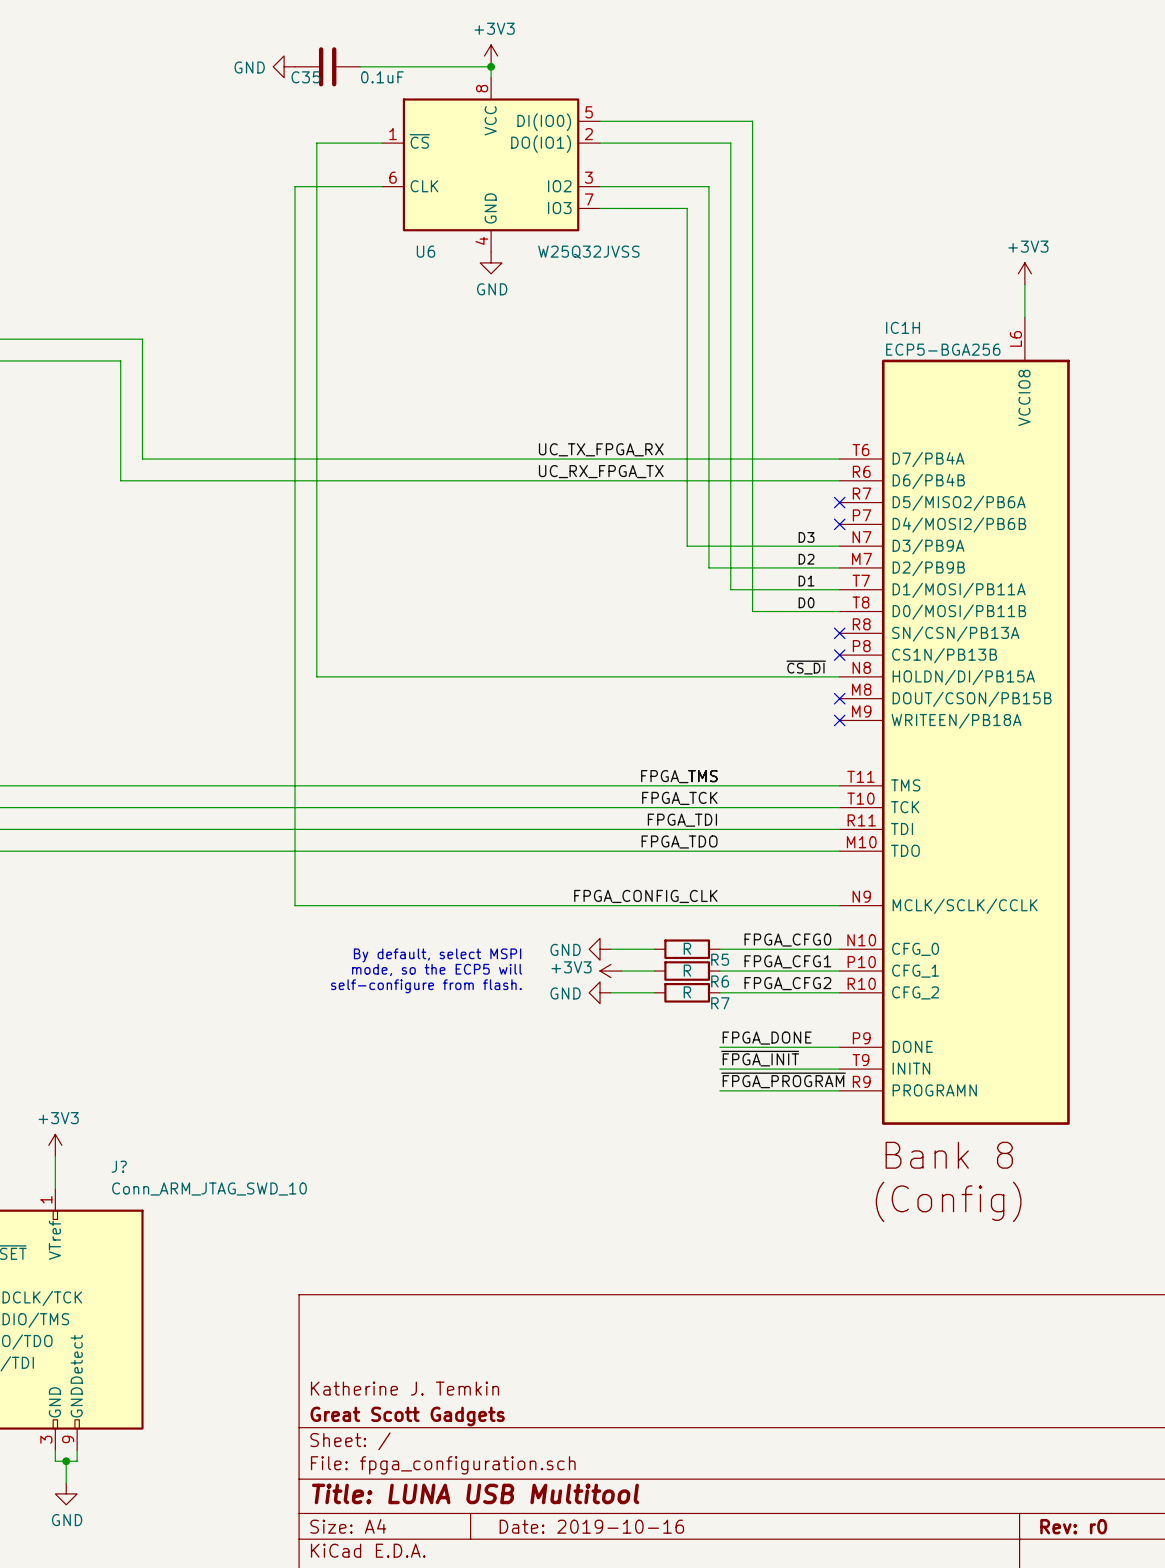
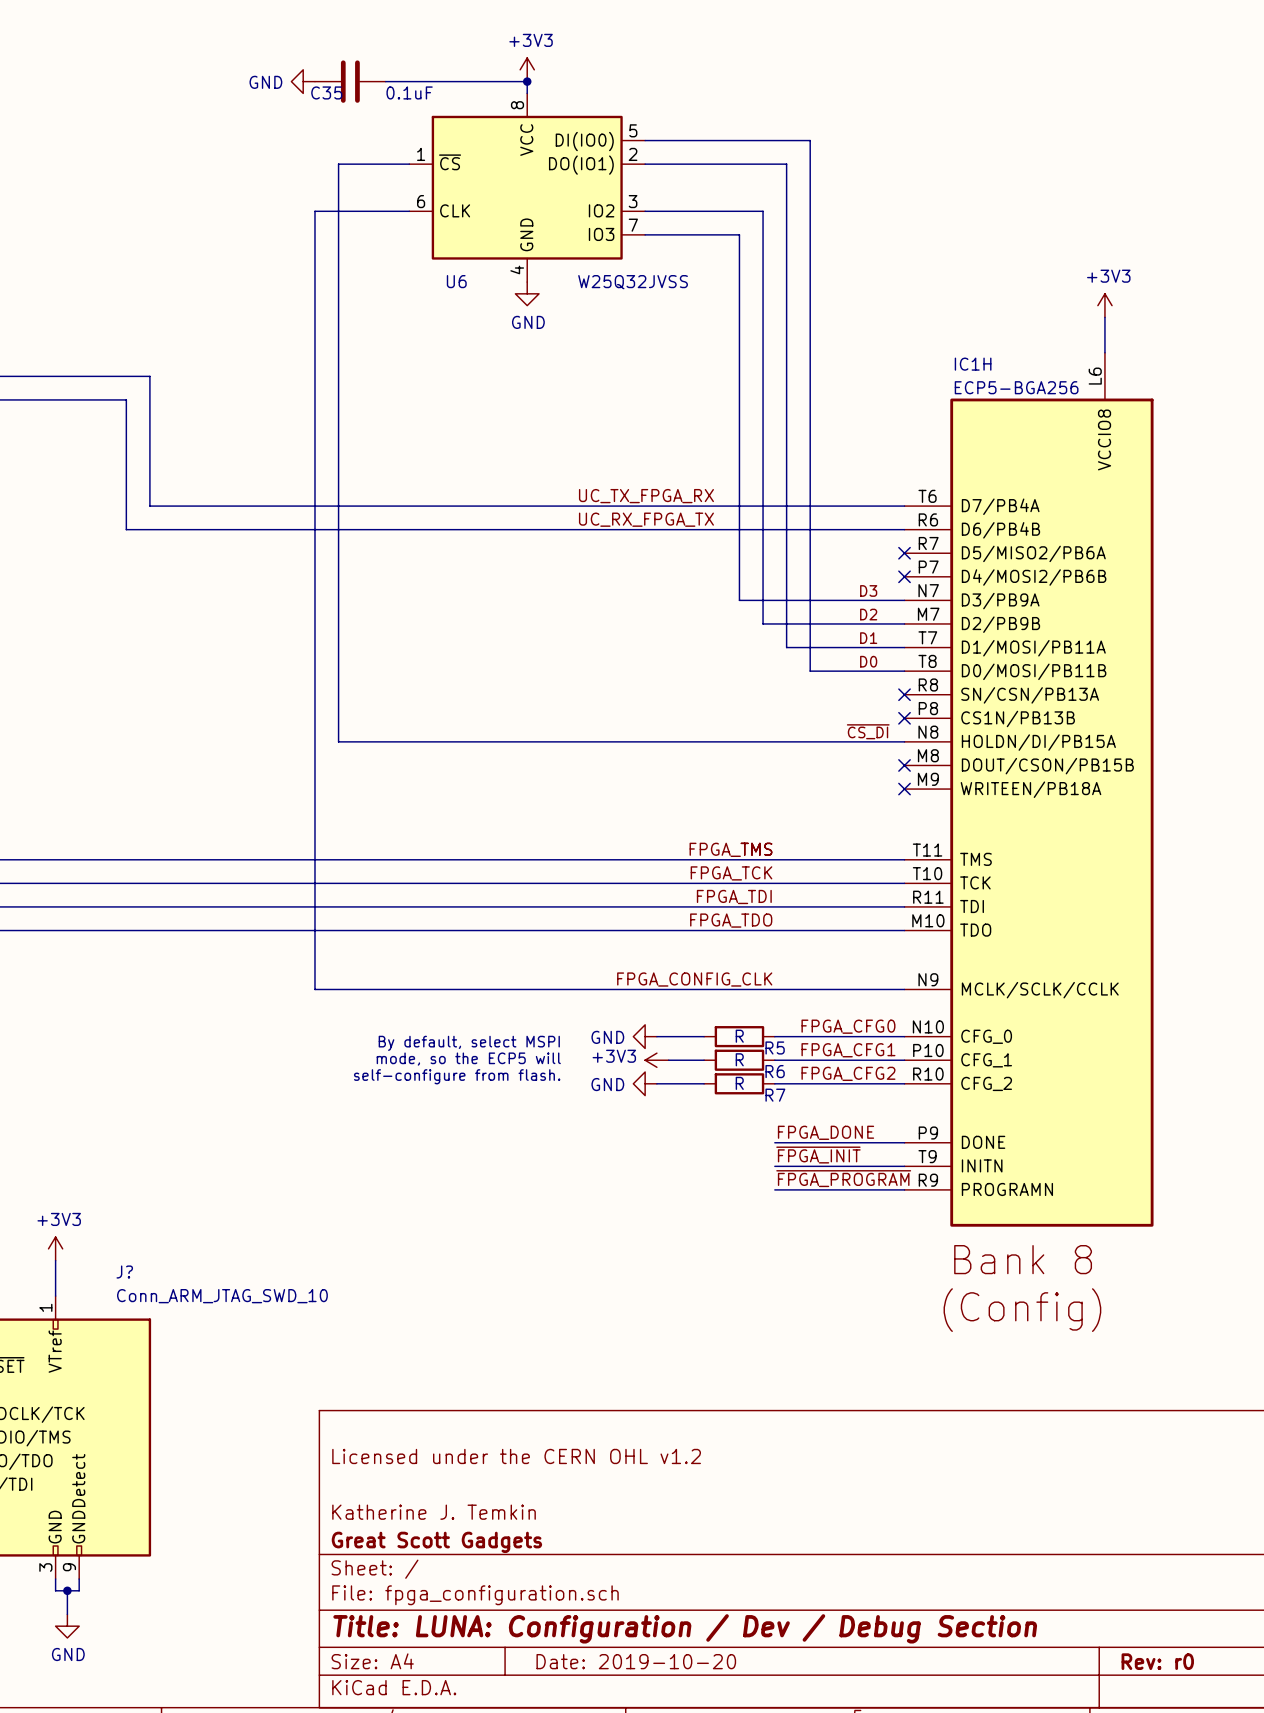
title block: none -> Licensed under the CERN OHL v1.2 (516, 1456)
title block: Title: LUNA USB Multitool (475, 1493) -> Title: LUNA: Configuration / Dev / Debug Section (685, 1628)
title block: Date: 2019-10-16 (591, 1526) -> Date: 2019-10-20 (636, 1661)

